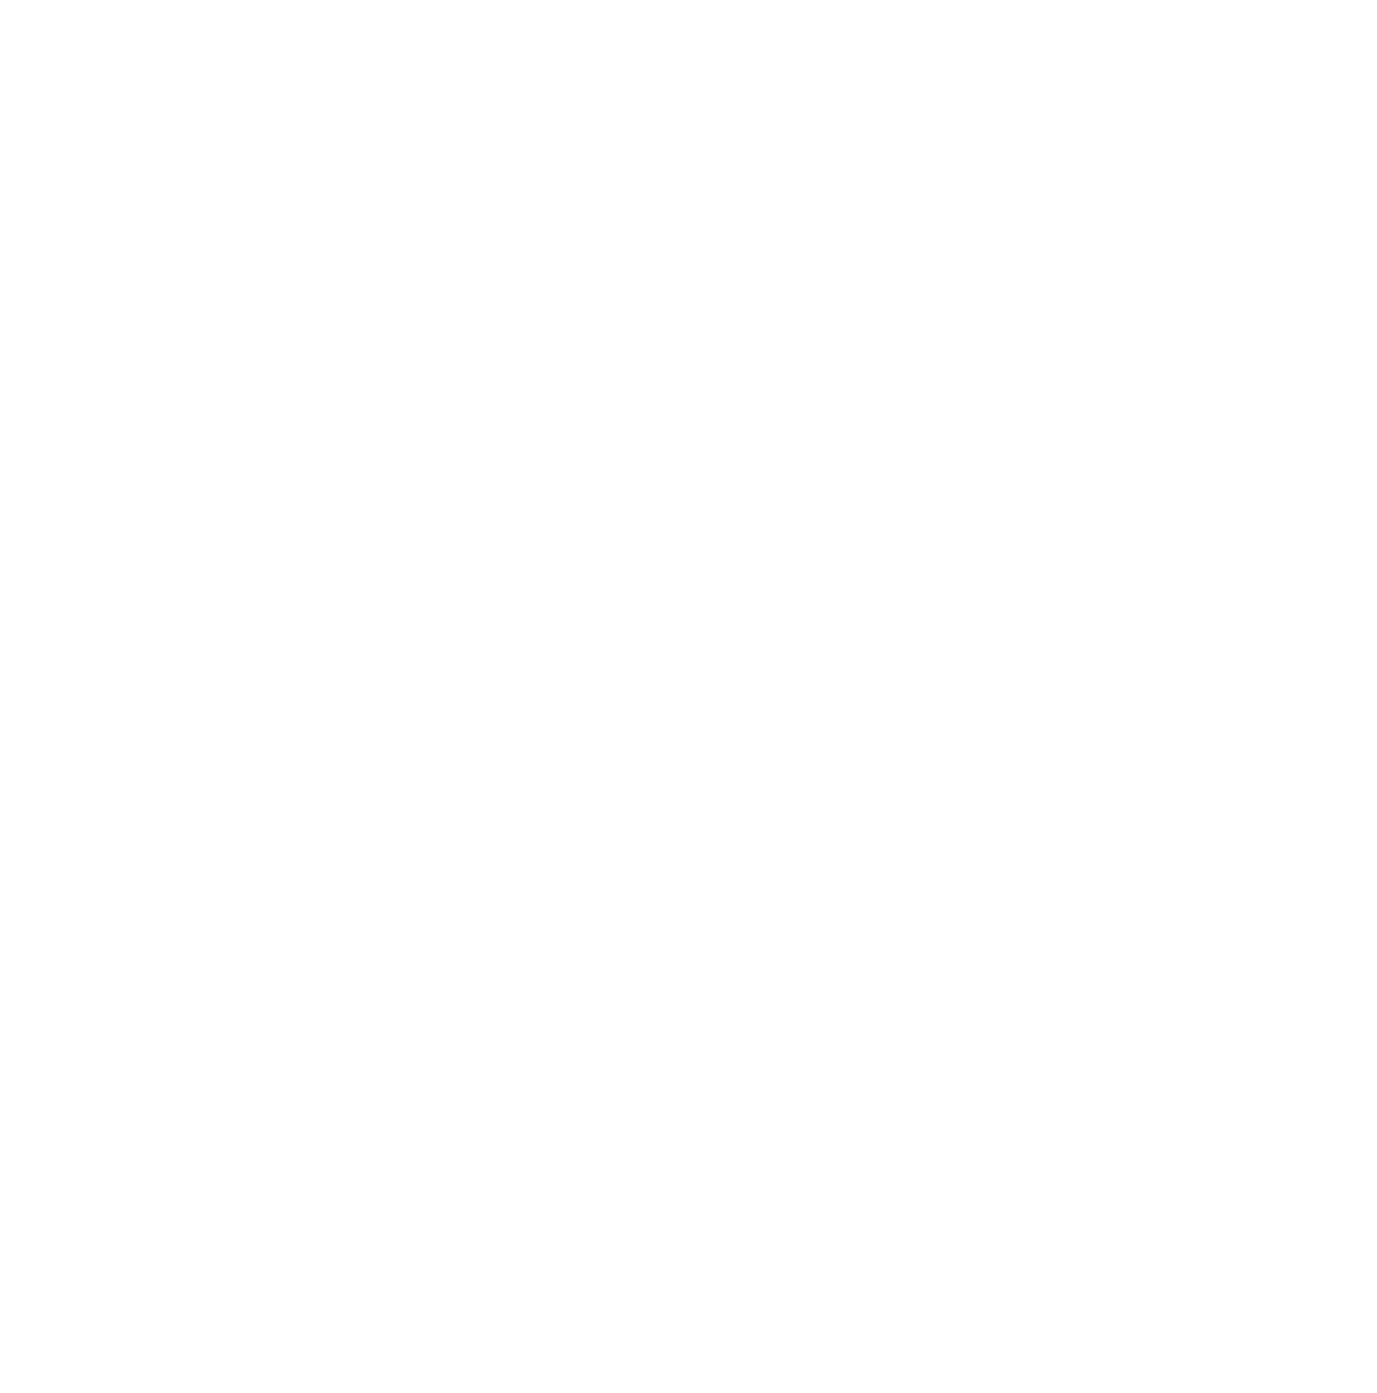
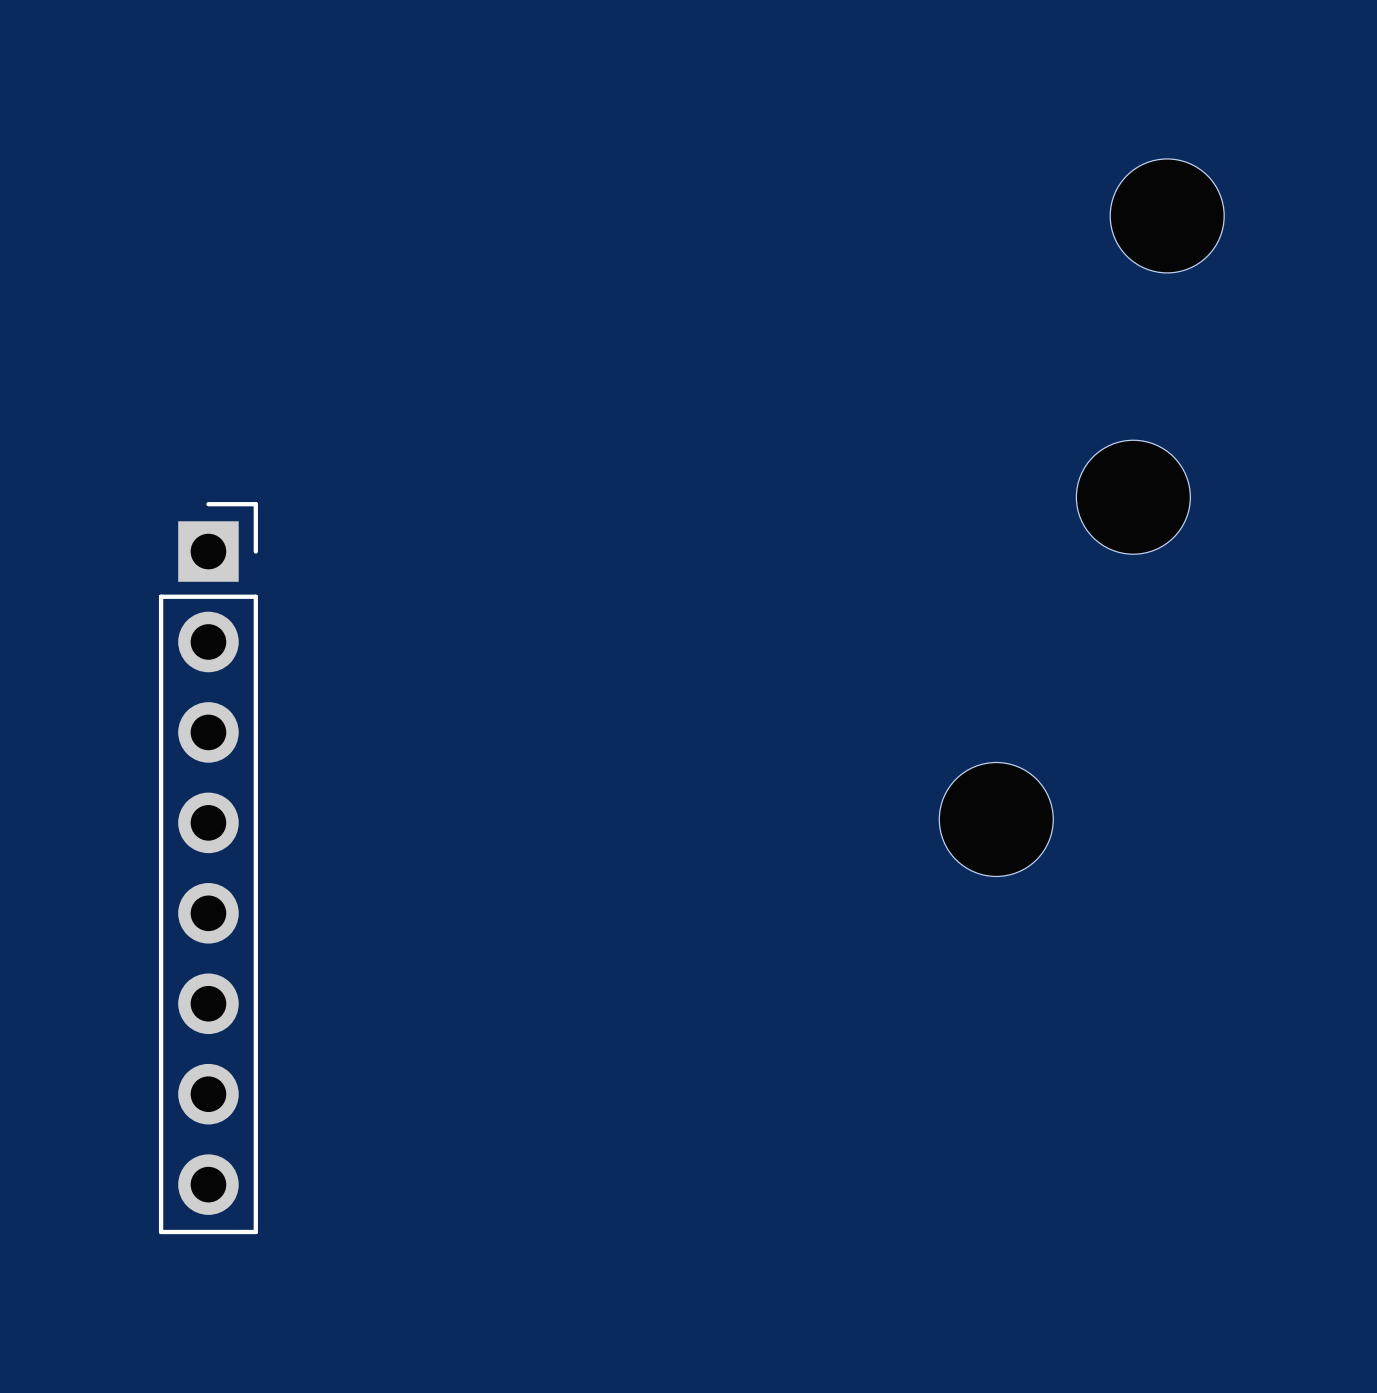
part: none -> (1167, 215)
part: none -> (1133, 497)
part: none -> (996, 819)
part: none -> (208, 868)

